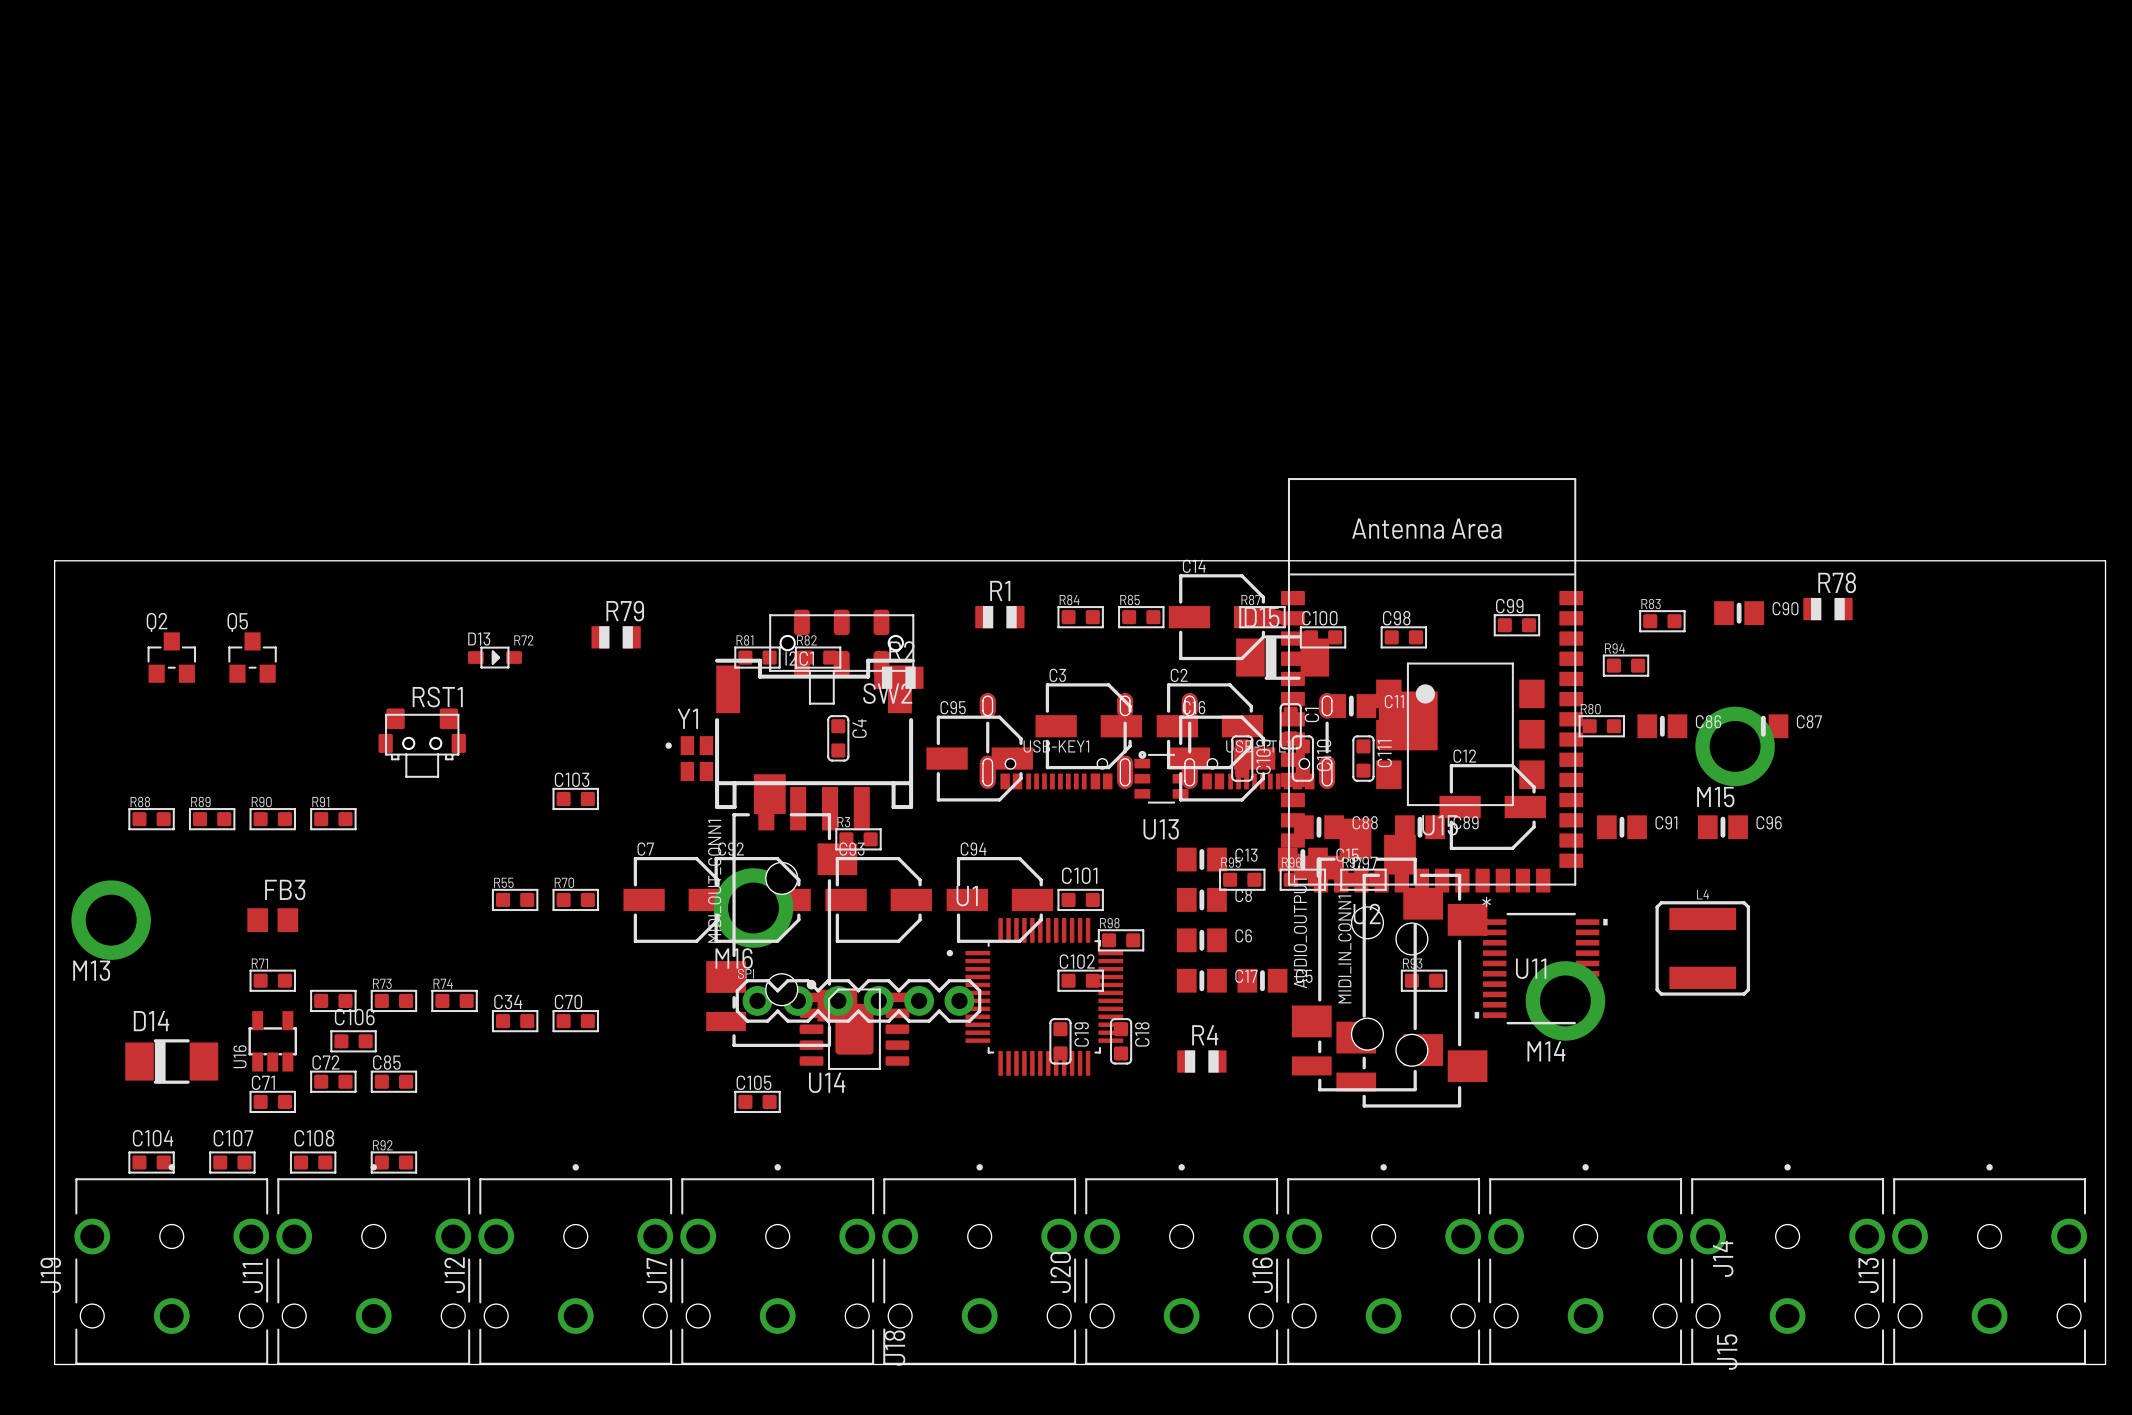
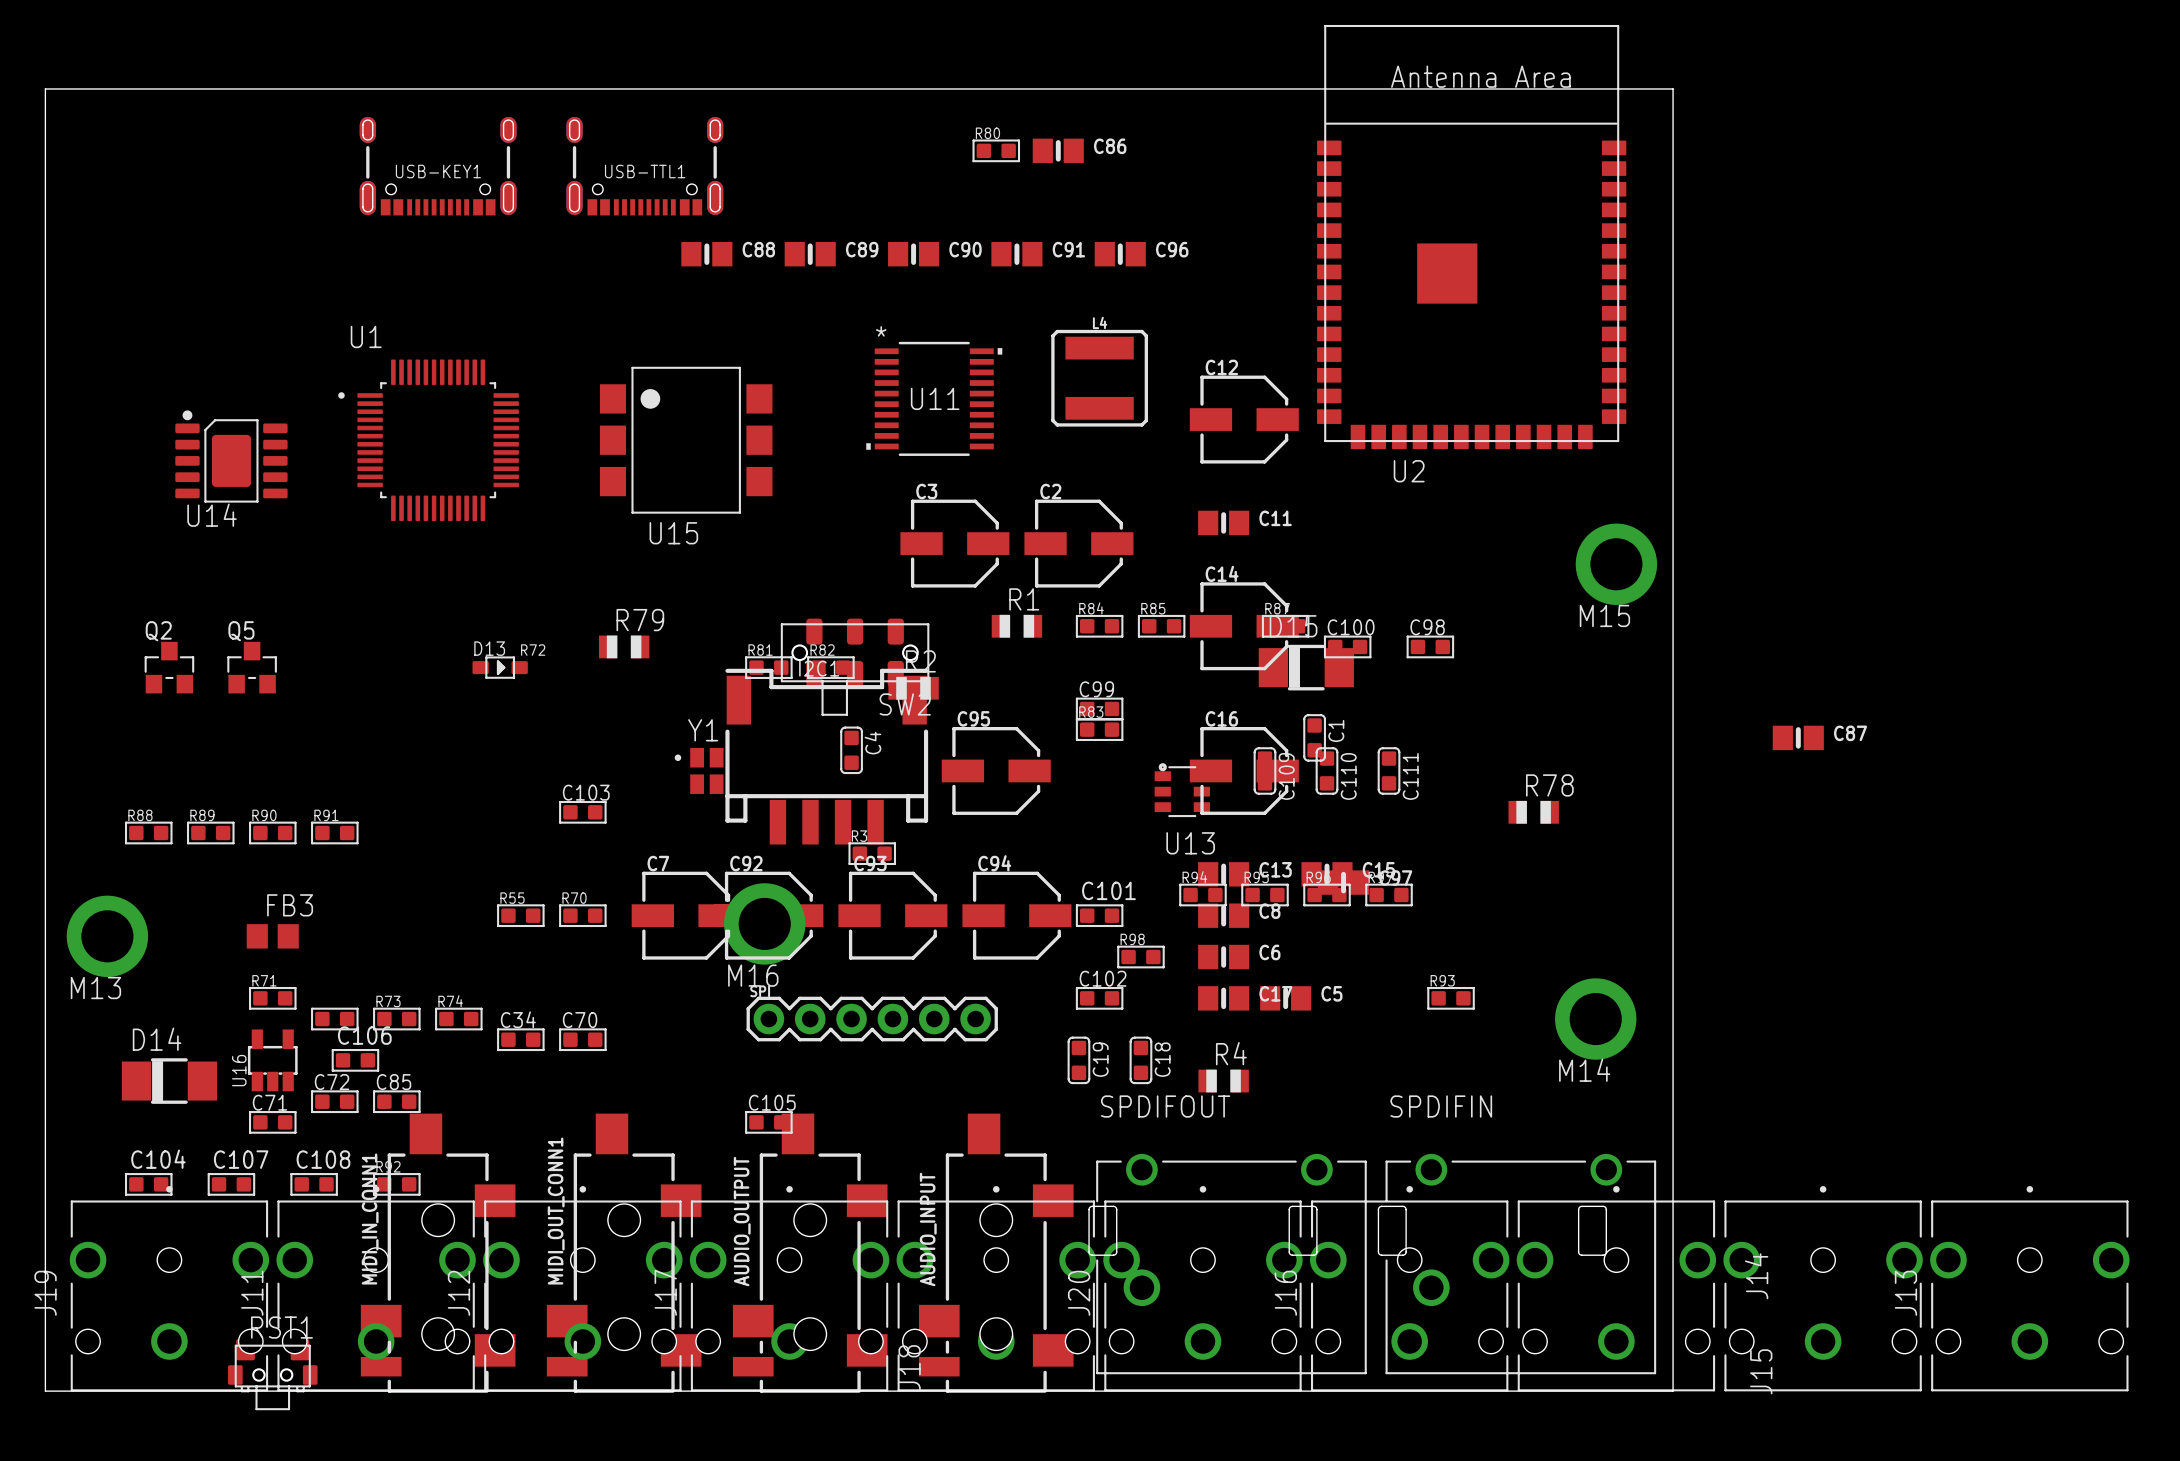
part: none -> U11 (934, 398)
R78 position: (1827, 609) -> (1533, 812)
C90 position: (1739, 613) -> (913, 254)
R83 position: (1662, 621) -> (1099, 729)
C99 position: (1516, 625) -> (1099, 708)
R94 position: (1626, 665) -> (1202, 895)
U2 position: (1432, 685) -> (1471, 237)
C11 position: (1351, 706) -> (1223, 522)
C3 position: (1088, 726) -> (954, 543)
C2 position: (1209, 726) -> (1078, 543)
R80 position: (1601, 726) -> (996, 150)
C86 position: (1662, 726) -> (1058, 150)
U15 position: (1460, 734) -> (686, 440)
USB-KEY1 position: (1056, 741) -> (438, 166)
USB-TTL1 position: (1258, 741) -> (644, 166)
RST1 position: (422, 743) -> (272, 1374)
M15 position: (1735, 746) -> (1616, 564)
C12 position: (1492, 807) -> (1244, 419)
C88 position: (1319, 827) -> (706, 254)
C89 position: (1419, 827) -> (810, 254)
C91 position: (1621, 827) -> (1016, 254)
C96 position: (1722, 827) -> (1120, 254)
MIDI_OUT_CONN1 position: (781, 910) -> (624, 1253)
L4 position: (1702, 948) -> (1099, 378)
AUDIO_OUTPUT: (1367, 955) -> none
part: U11 (1541, 968) -> none
MIDI_IN_CONN1 position: (1411, 971) -> (438, 1253)
U1 position: (1034, 996) -> (428, 440)
U14 position: (854, 1024) -> (231, 456)
AUDIO_OUTPUT: none -> (810, 1253)
AUDIO_INPUT: none -> (996, 1253)
SPDIFOUT: none -> (1227, 1264)
SPDIFIN: none -> (1517, 1264)
board edge: (54, 1364) (54, 560) (2105, 560) (2105, 1364) (1640, 1364) -> (49, 1391) (45, 1391) (45, 88) (1673, 88) (1673, 1391)

